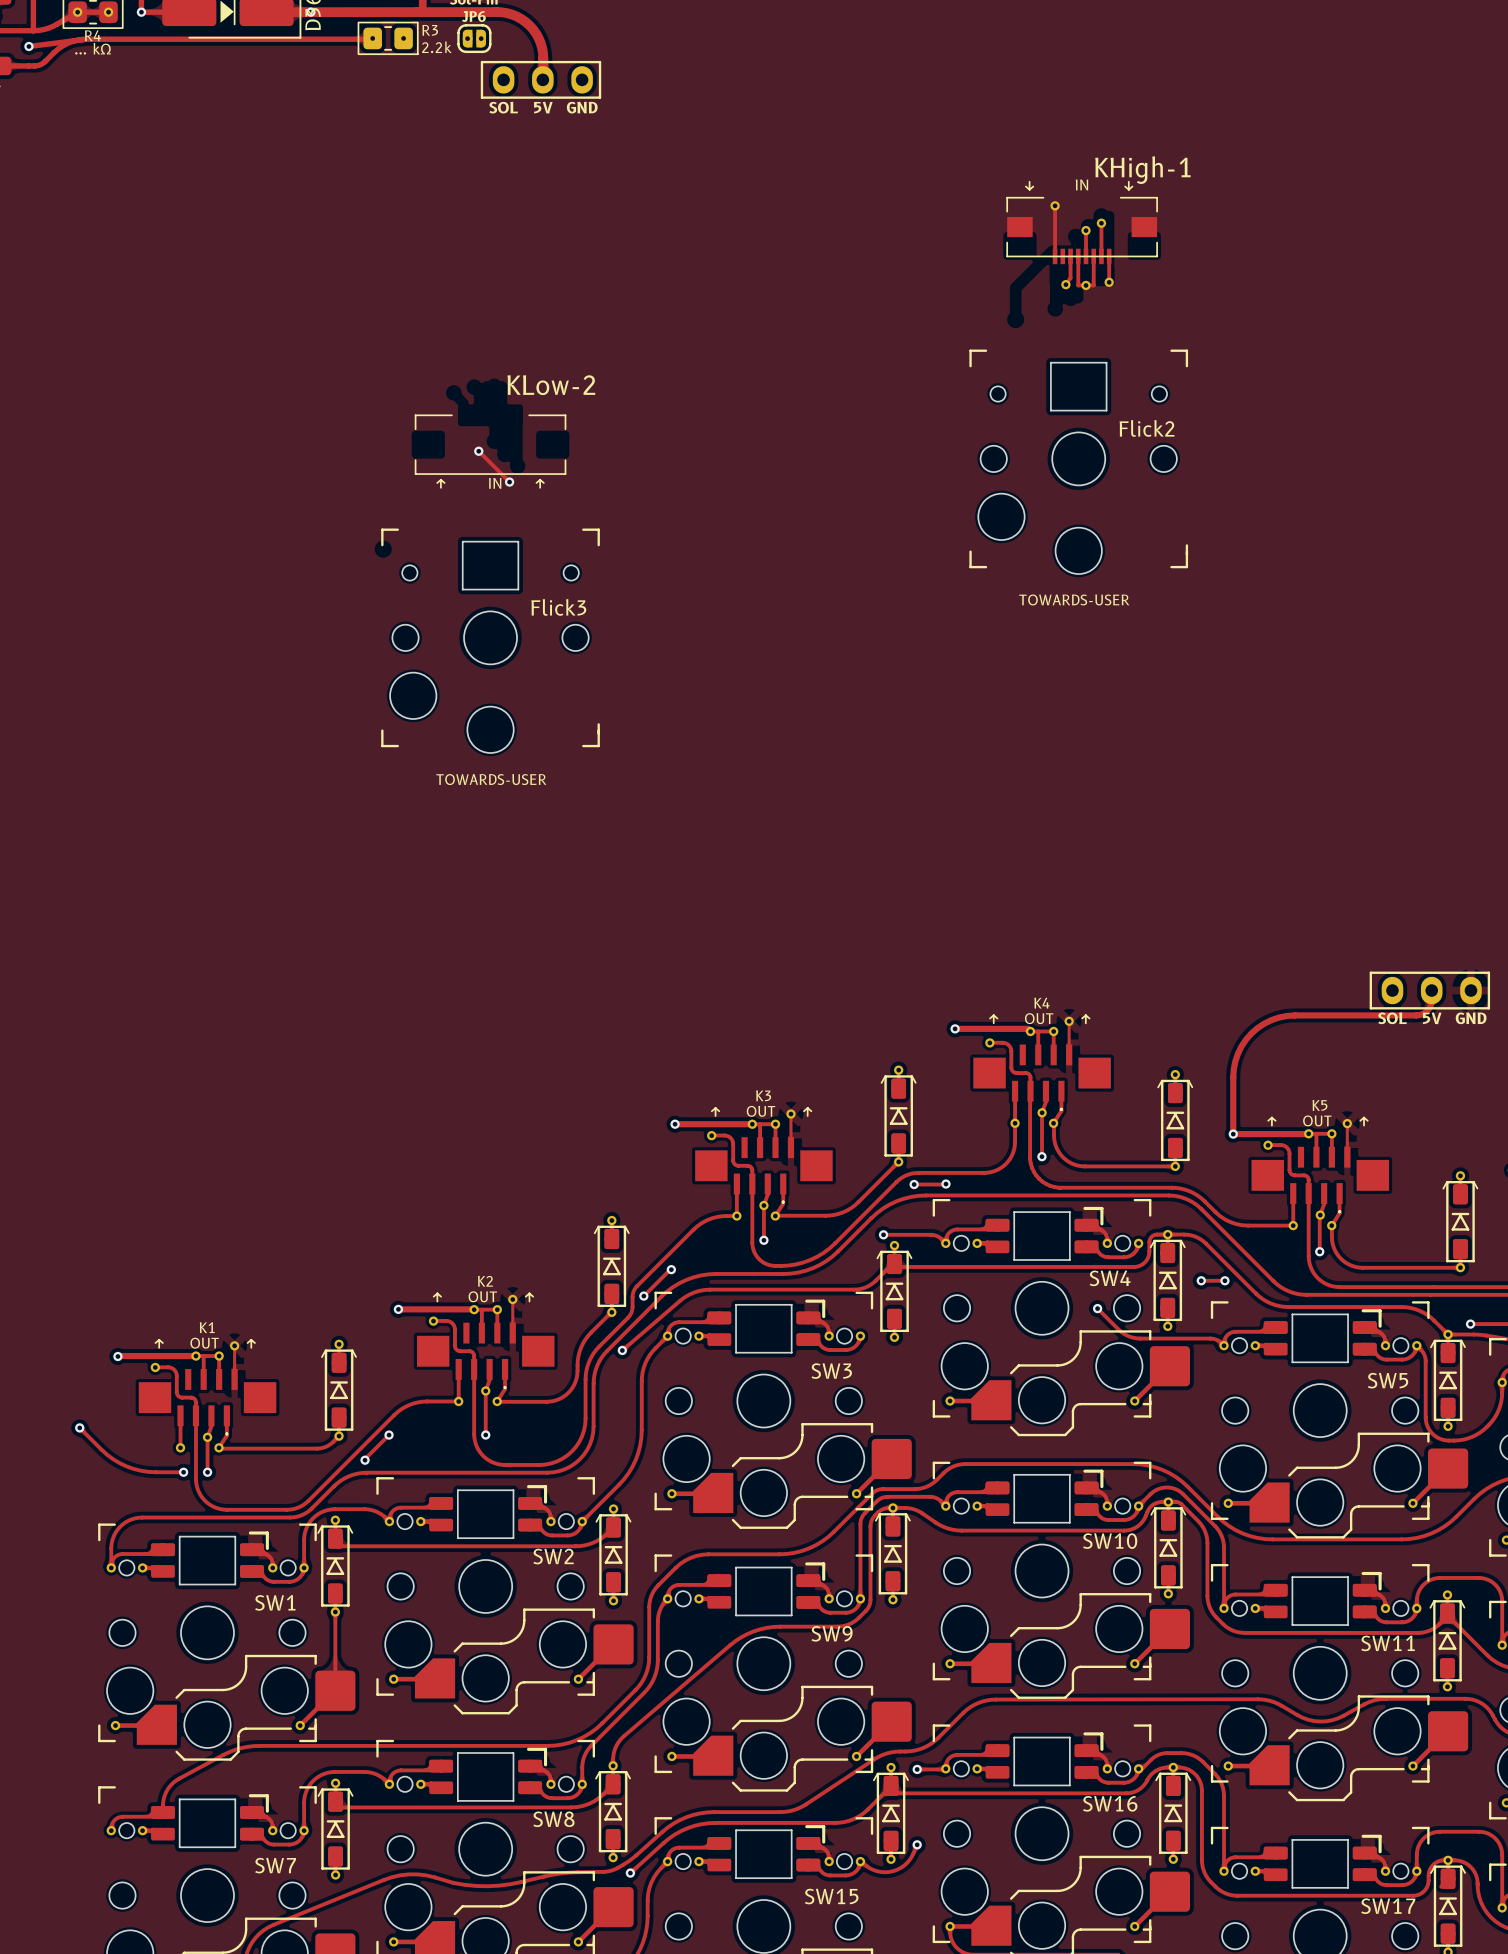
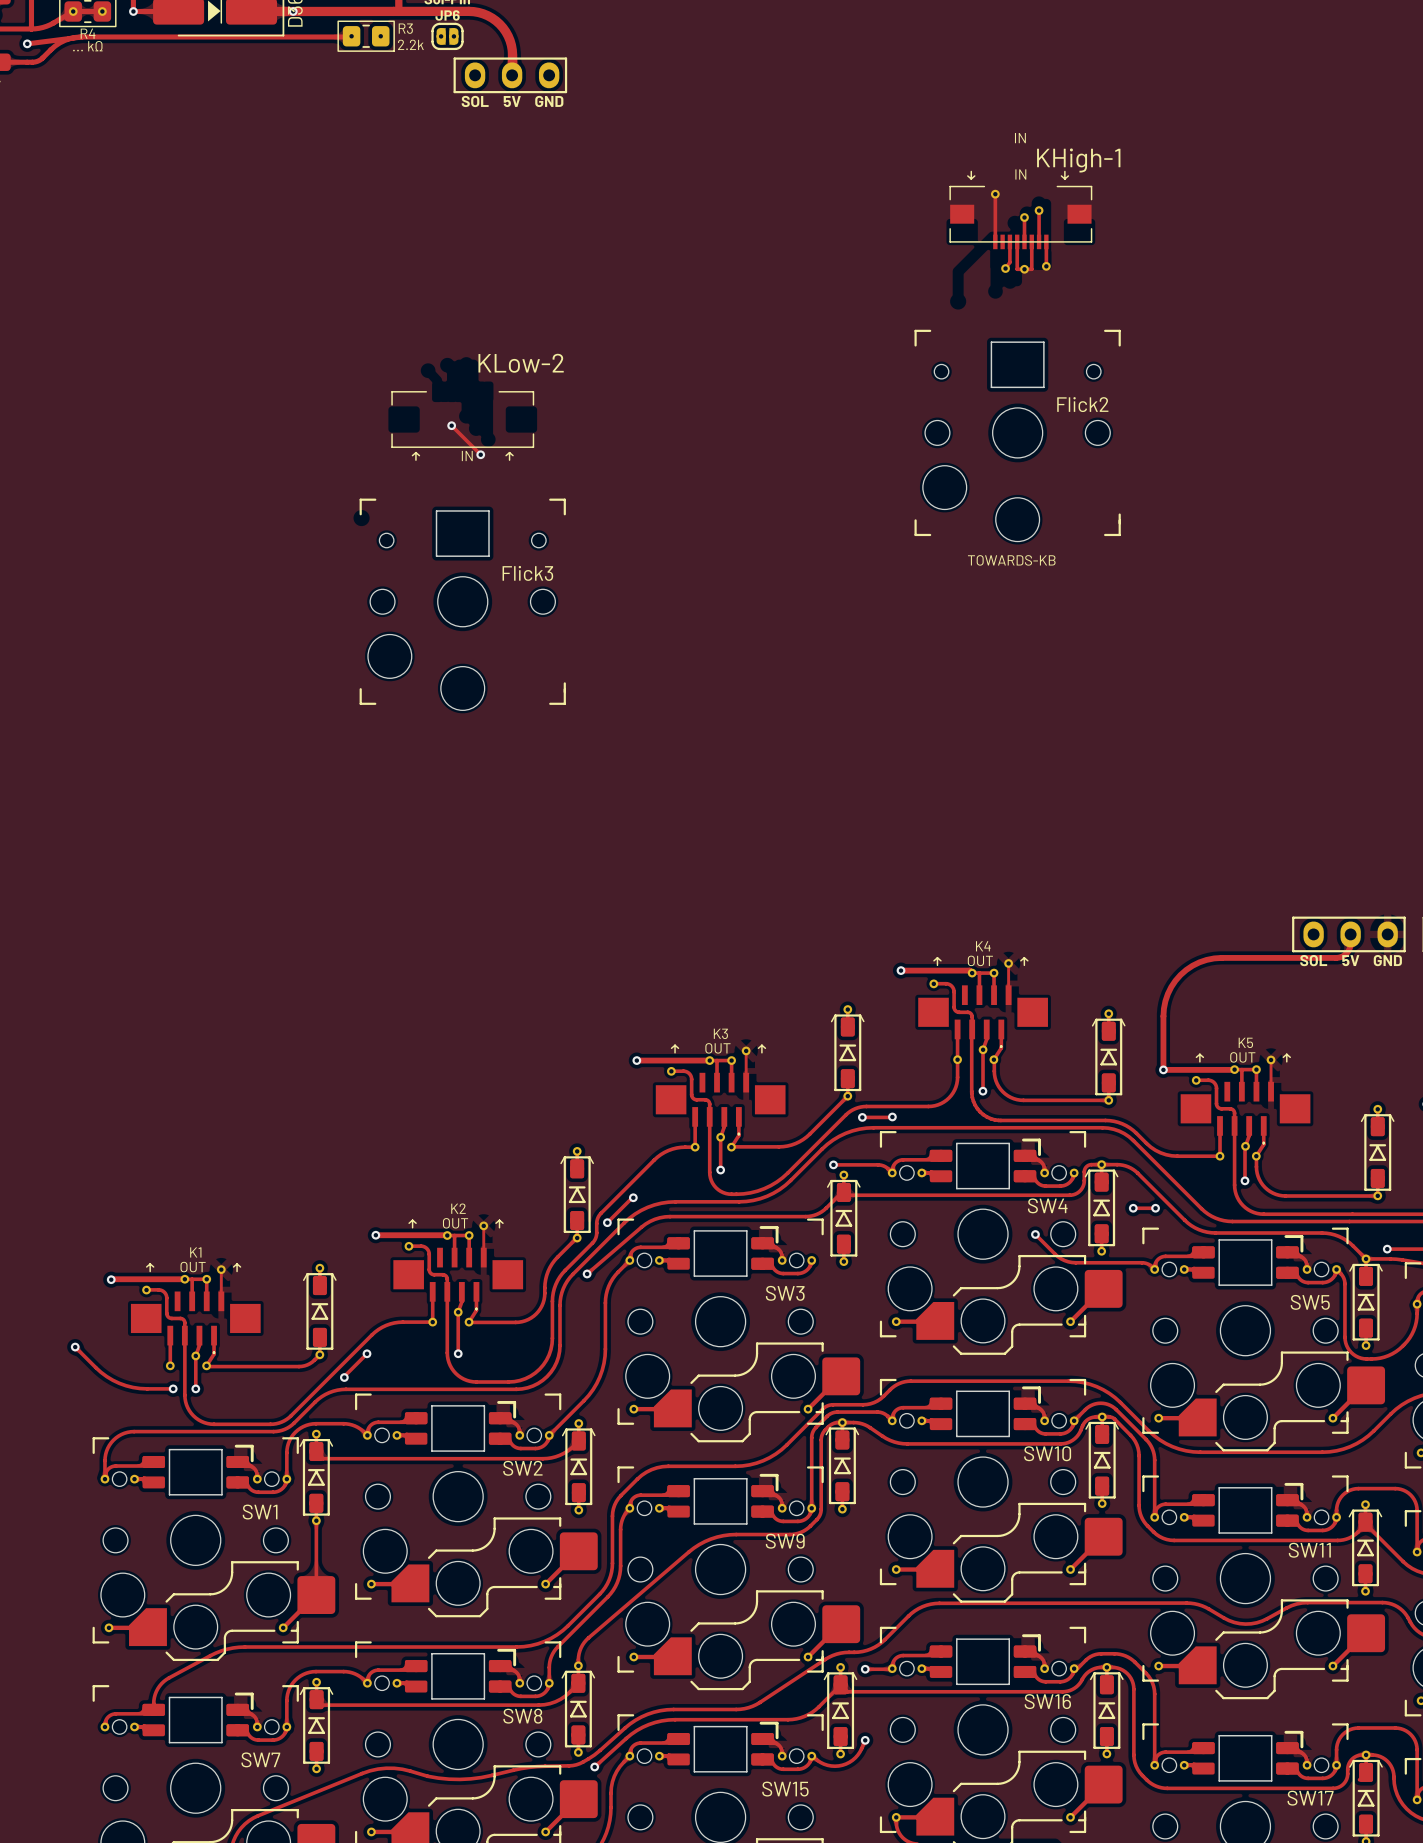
KHigh-1 text: none -> IN (1020, 138)
text: TOWARDS-USER (1074, 599) -> TOWARDS-KB (1011, 560)
text: TOWARDS-USER (491, 779) -> none

